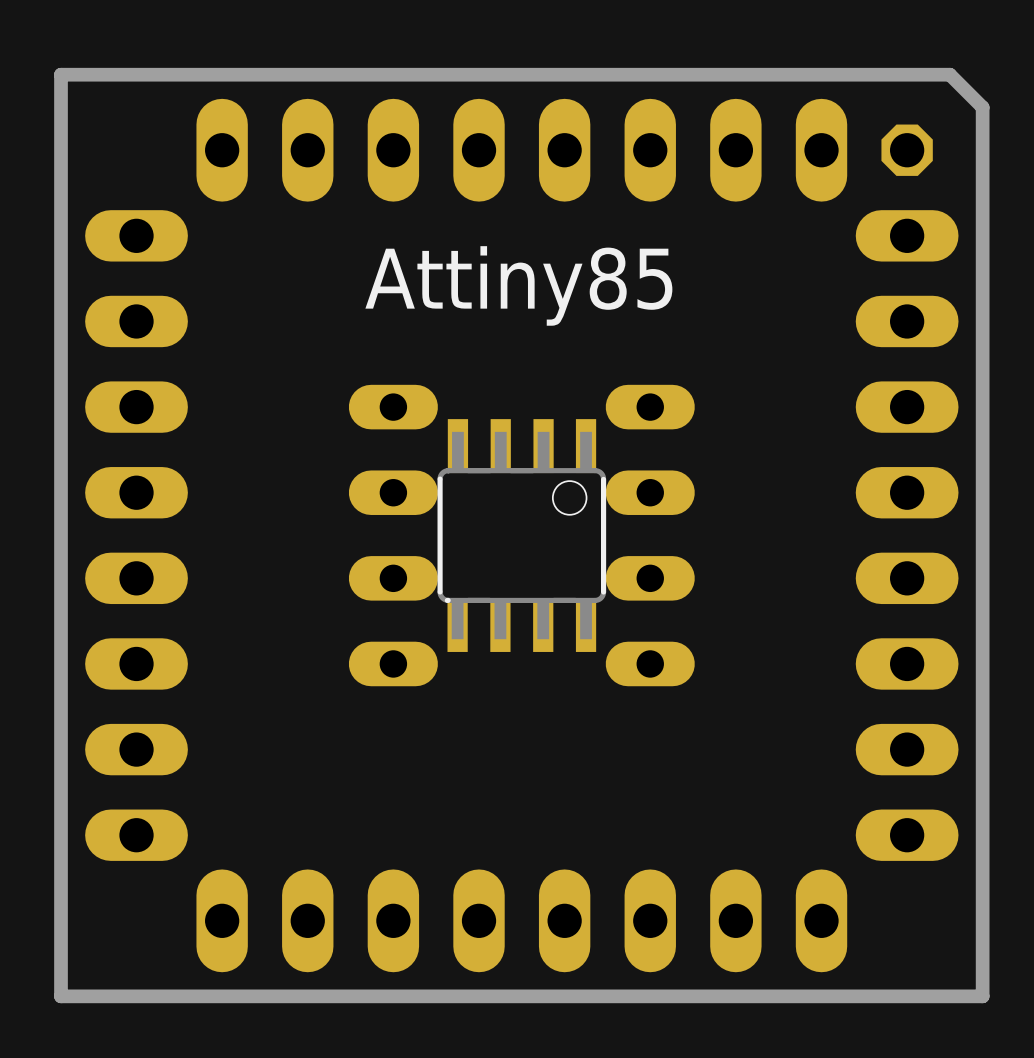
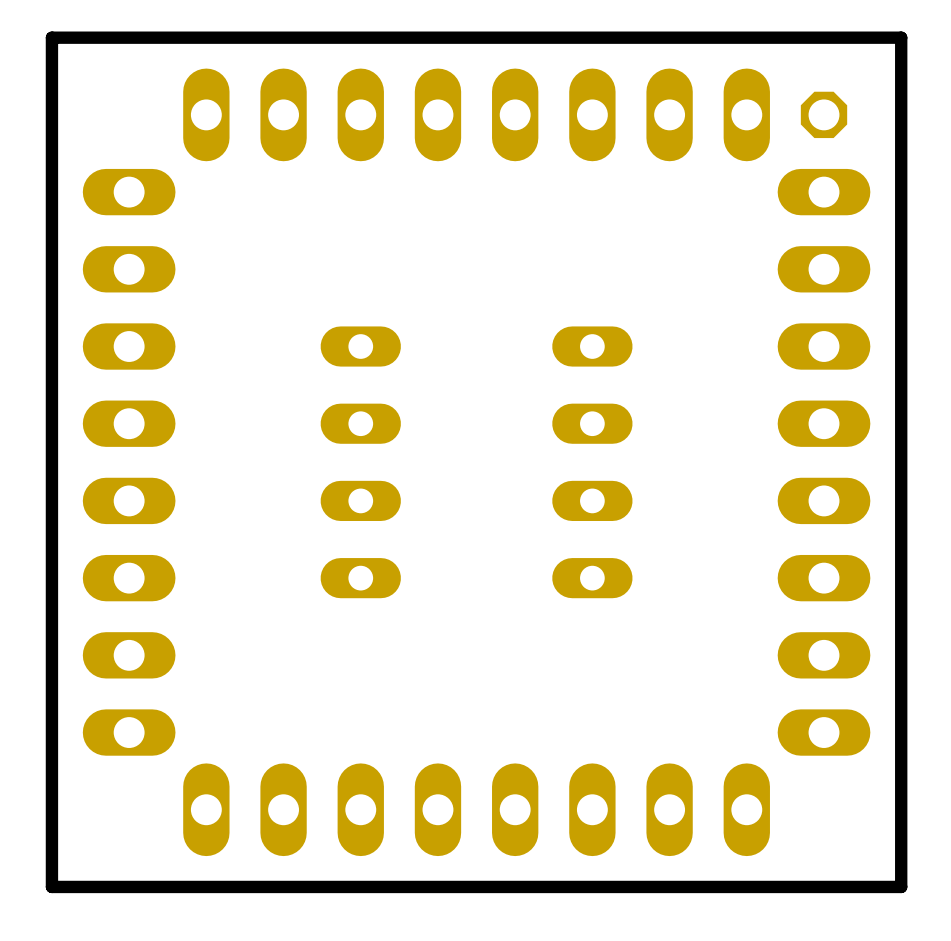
board edge: (949, 74) (61, 74) (61, 996) (982, 996) (982, 107) (949, 74) -> (901, 37) (901, 886) (51, 886) (51, 37) (901, 37)
text: Attiny85 (518, 285) -> none
part: (521, 535) -> none

